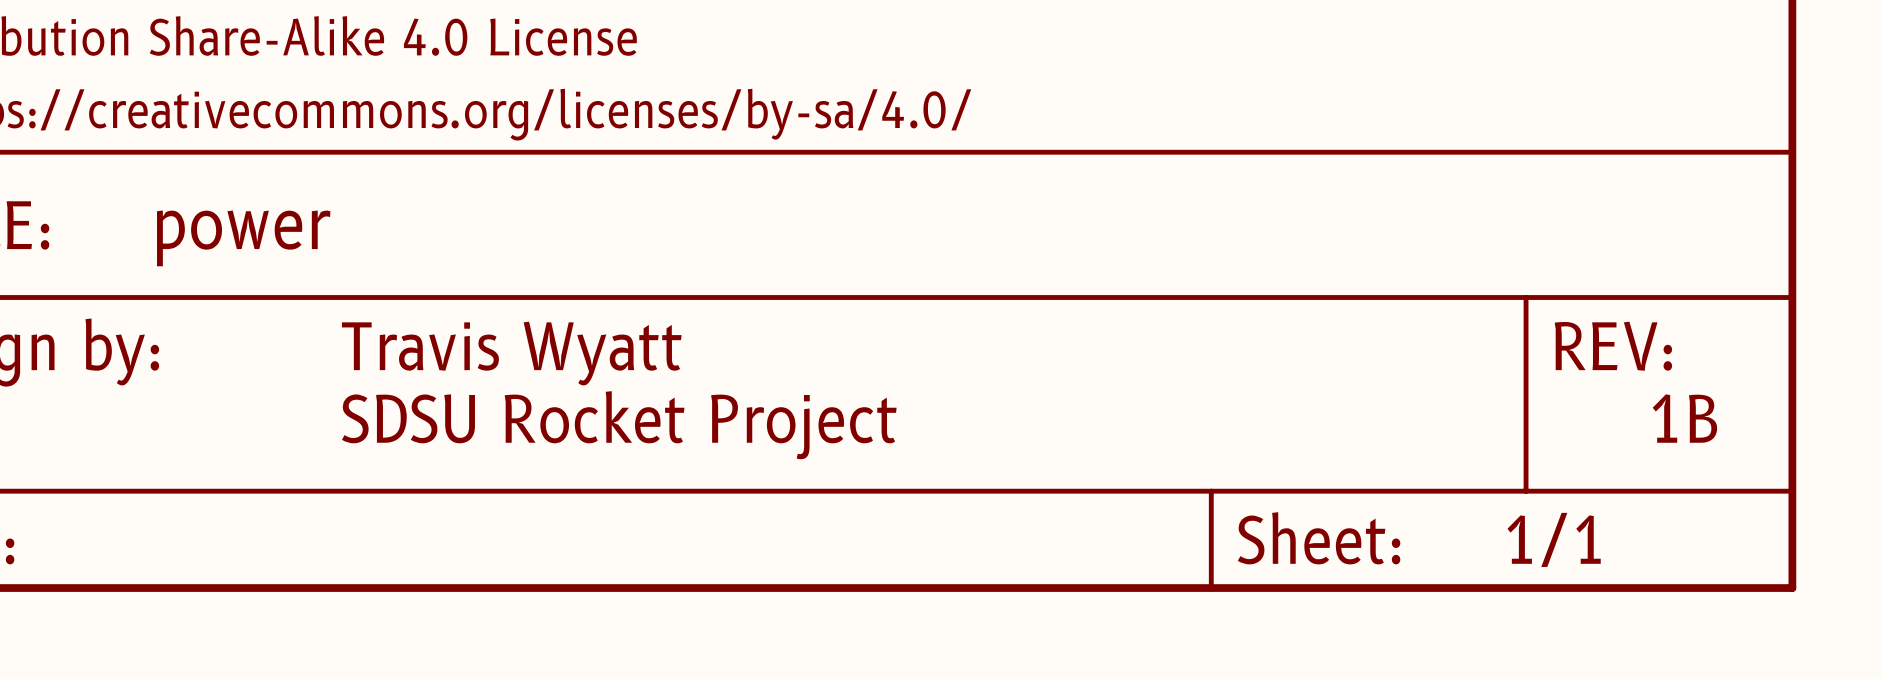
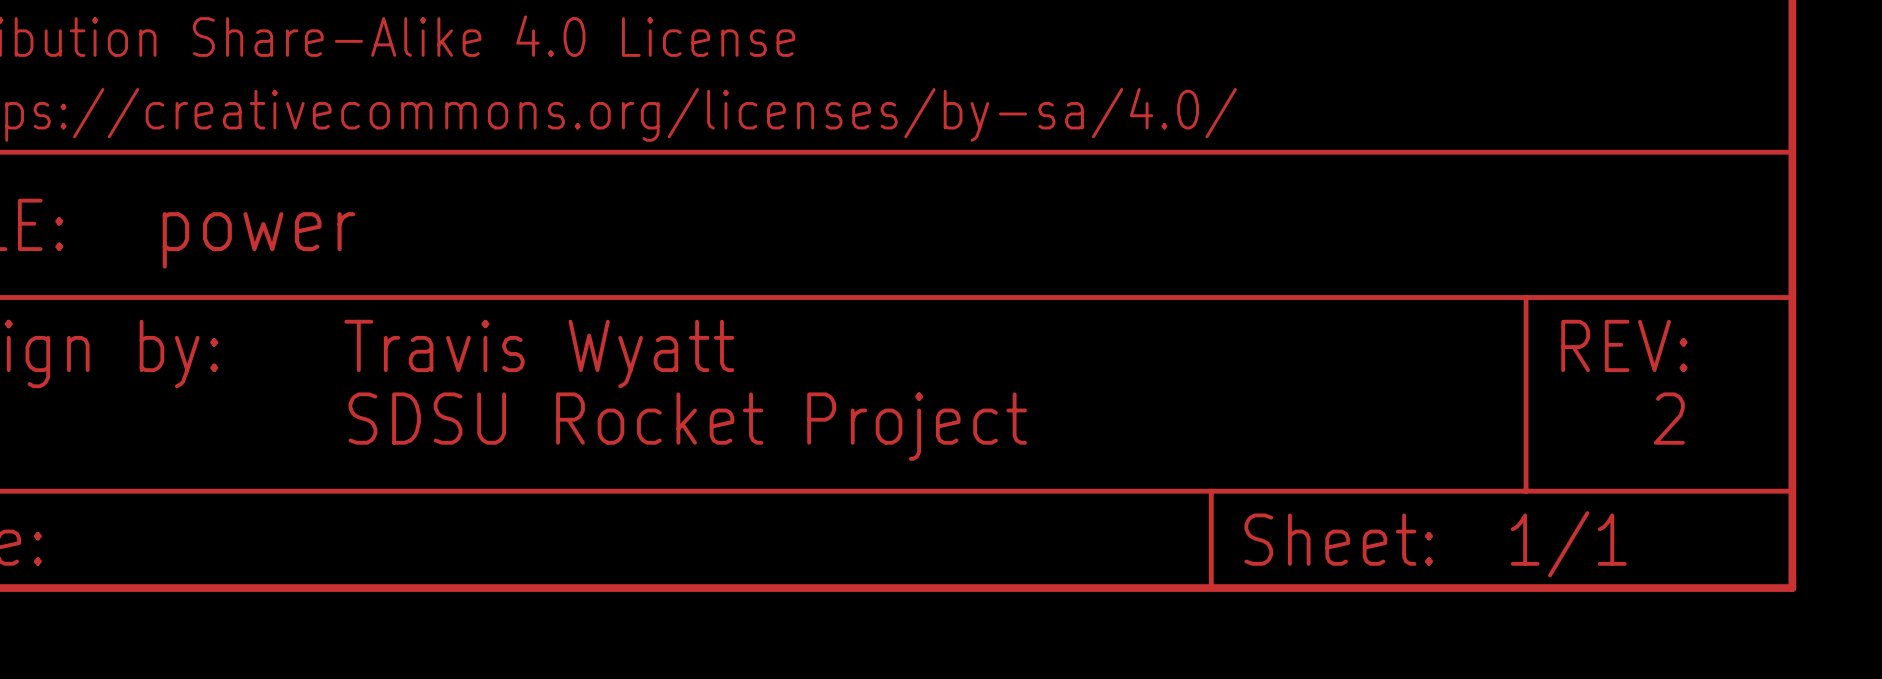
text: 1B (1684, 418) -> 2 (1669, 418)

